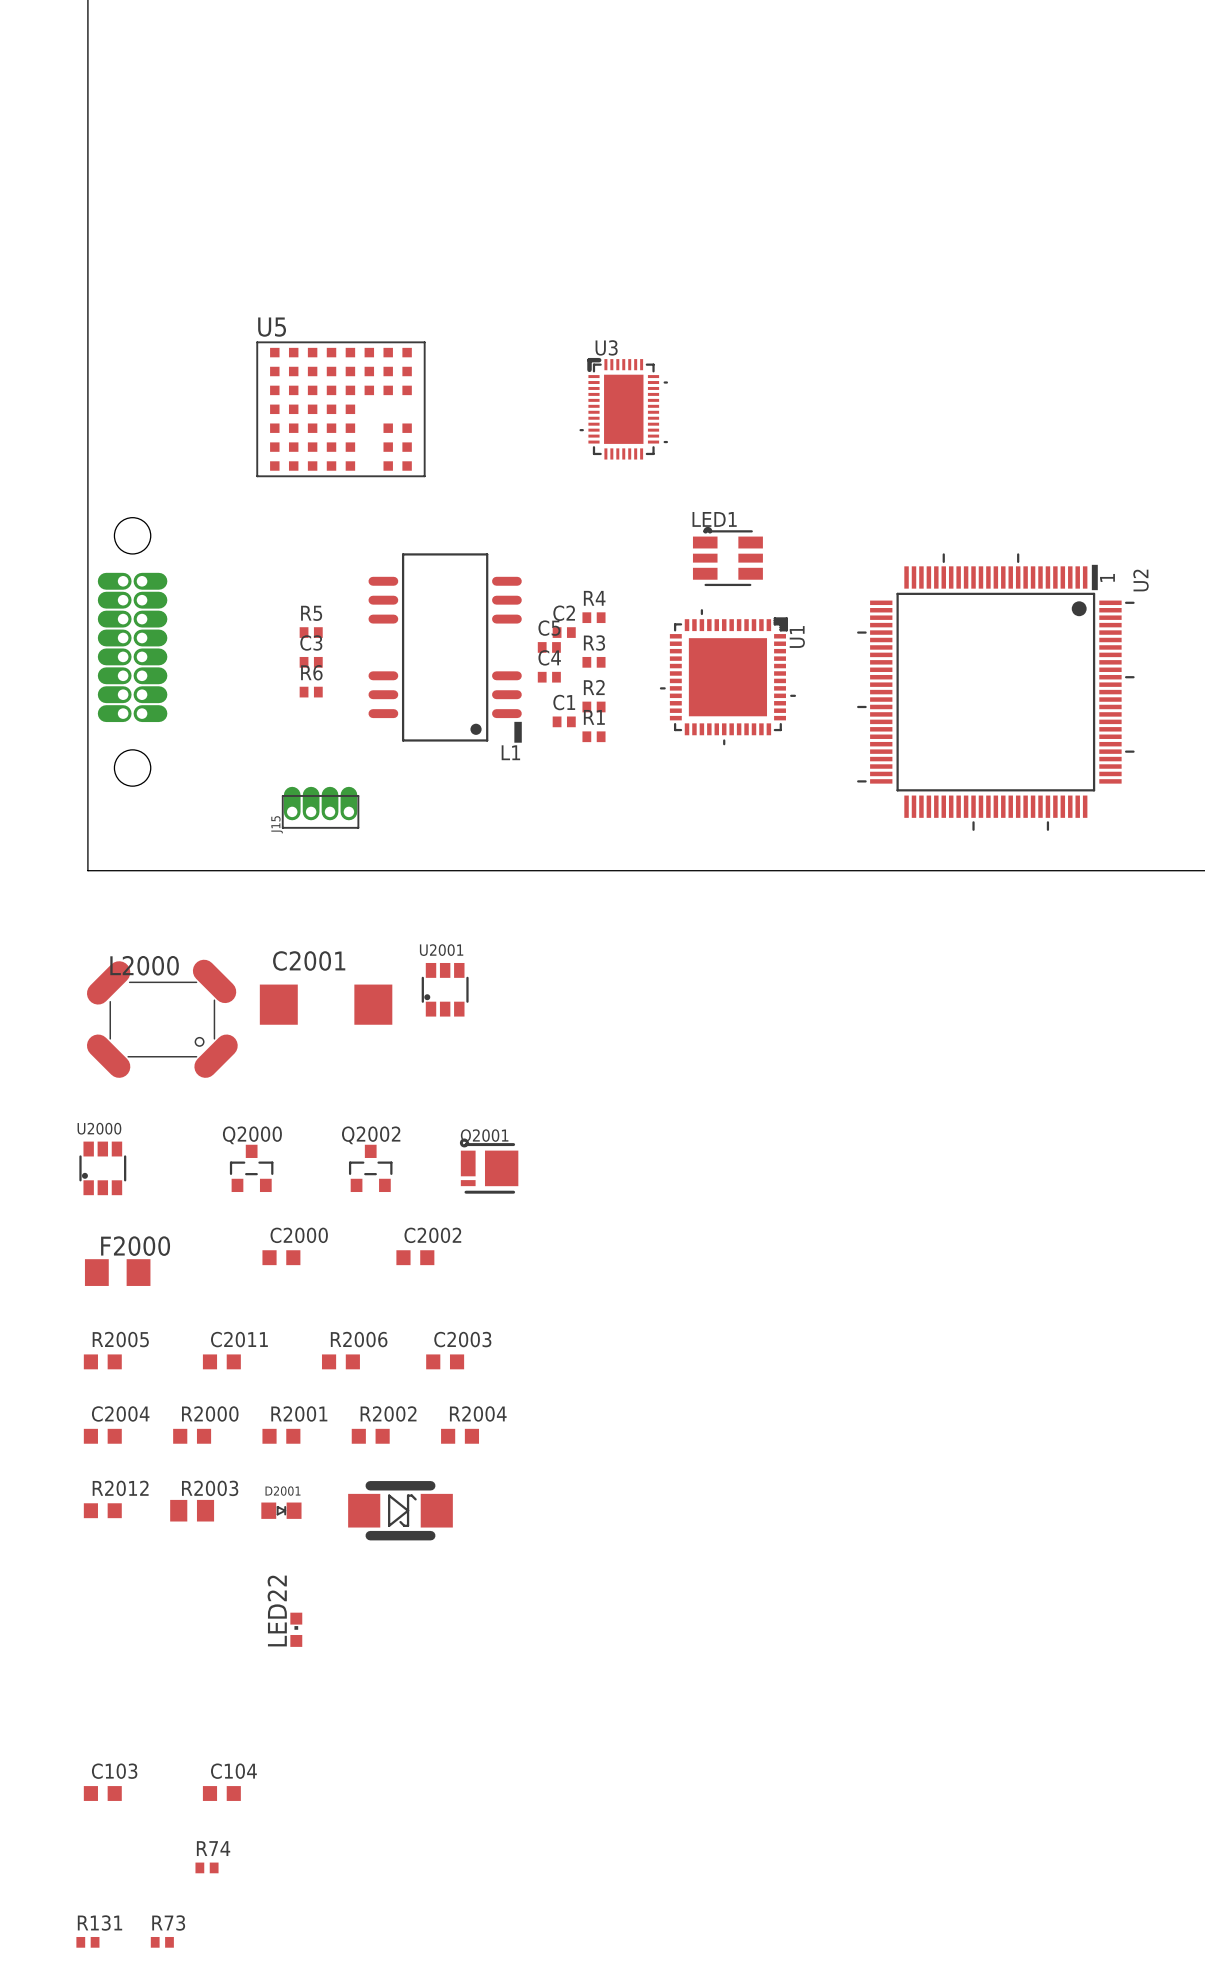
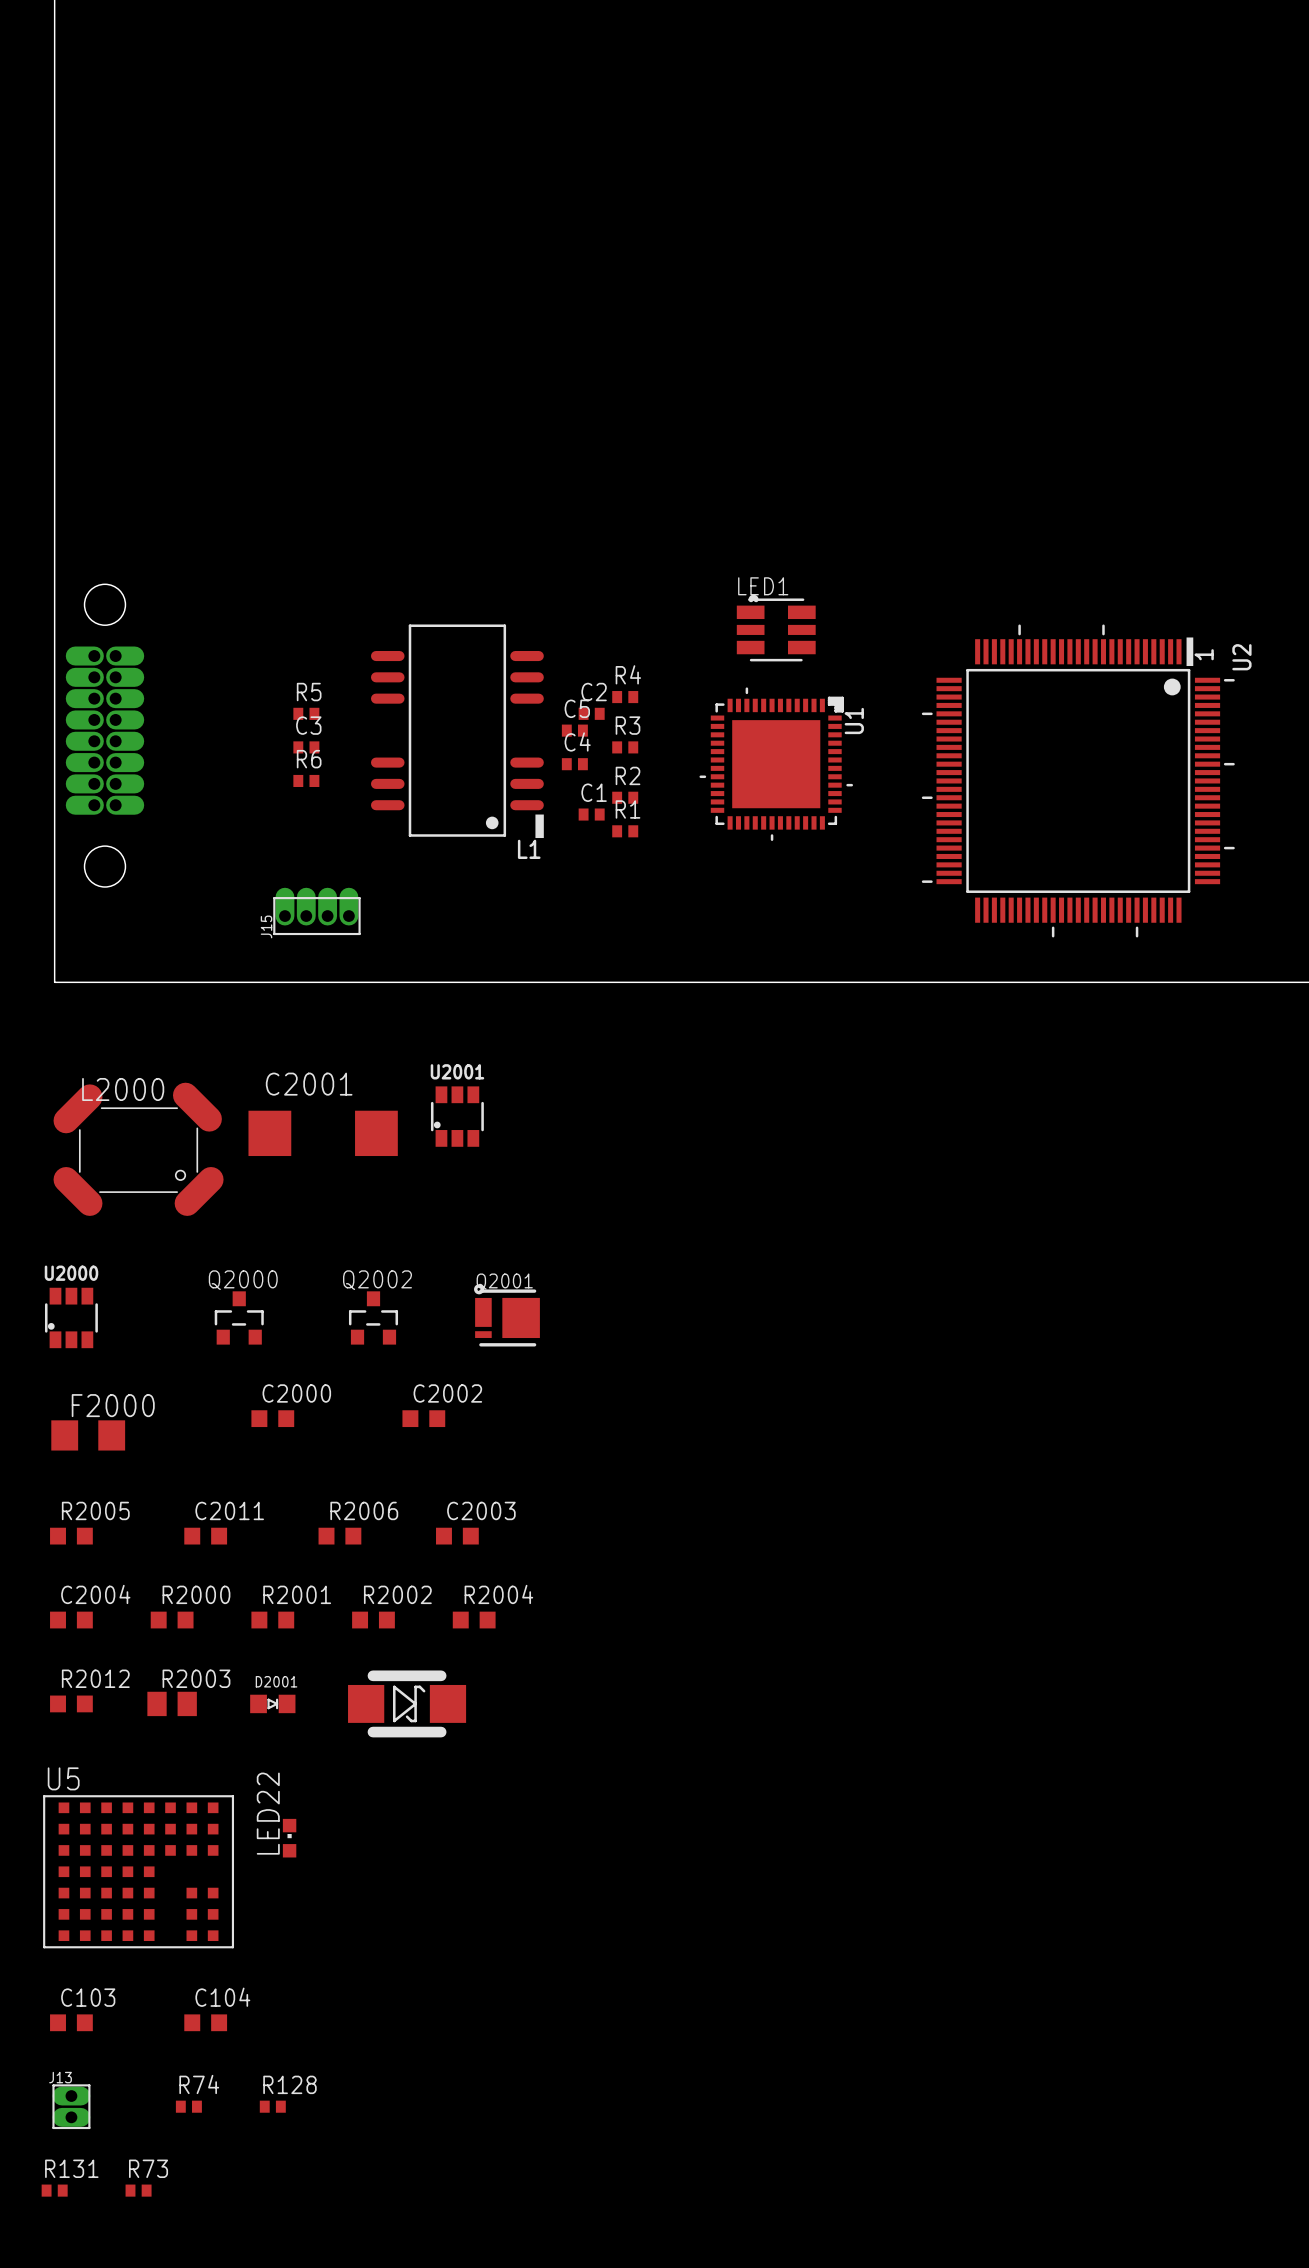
U3: (623, 408) -> none
U5 position: (340, 409) -> (138, 1871)
J13: none -> (71, 2106)
R128: none -> (272, 2106)

